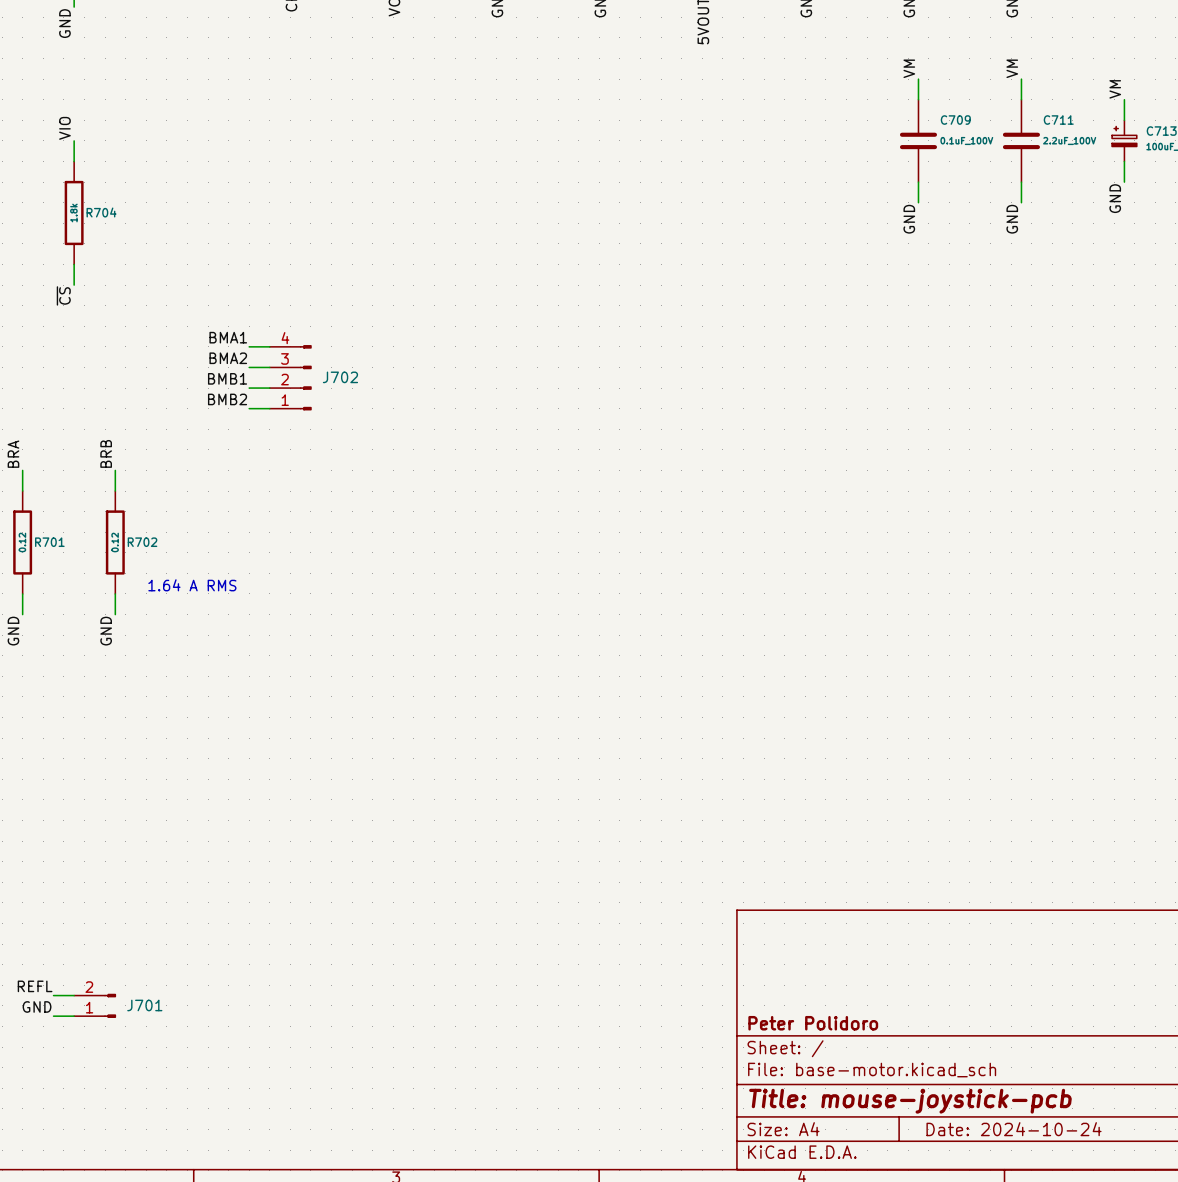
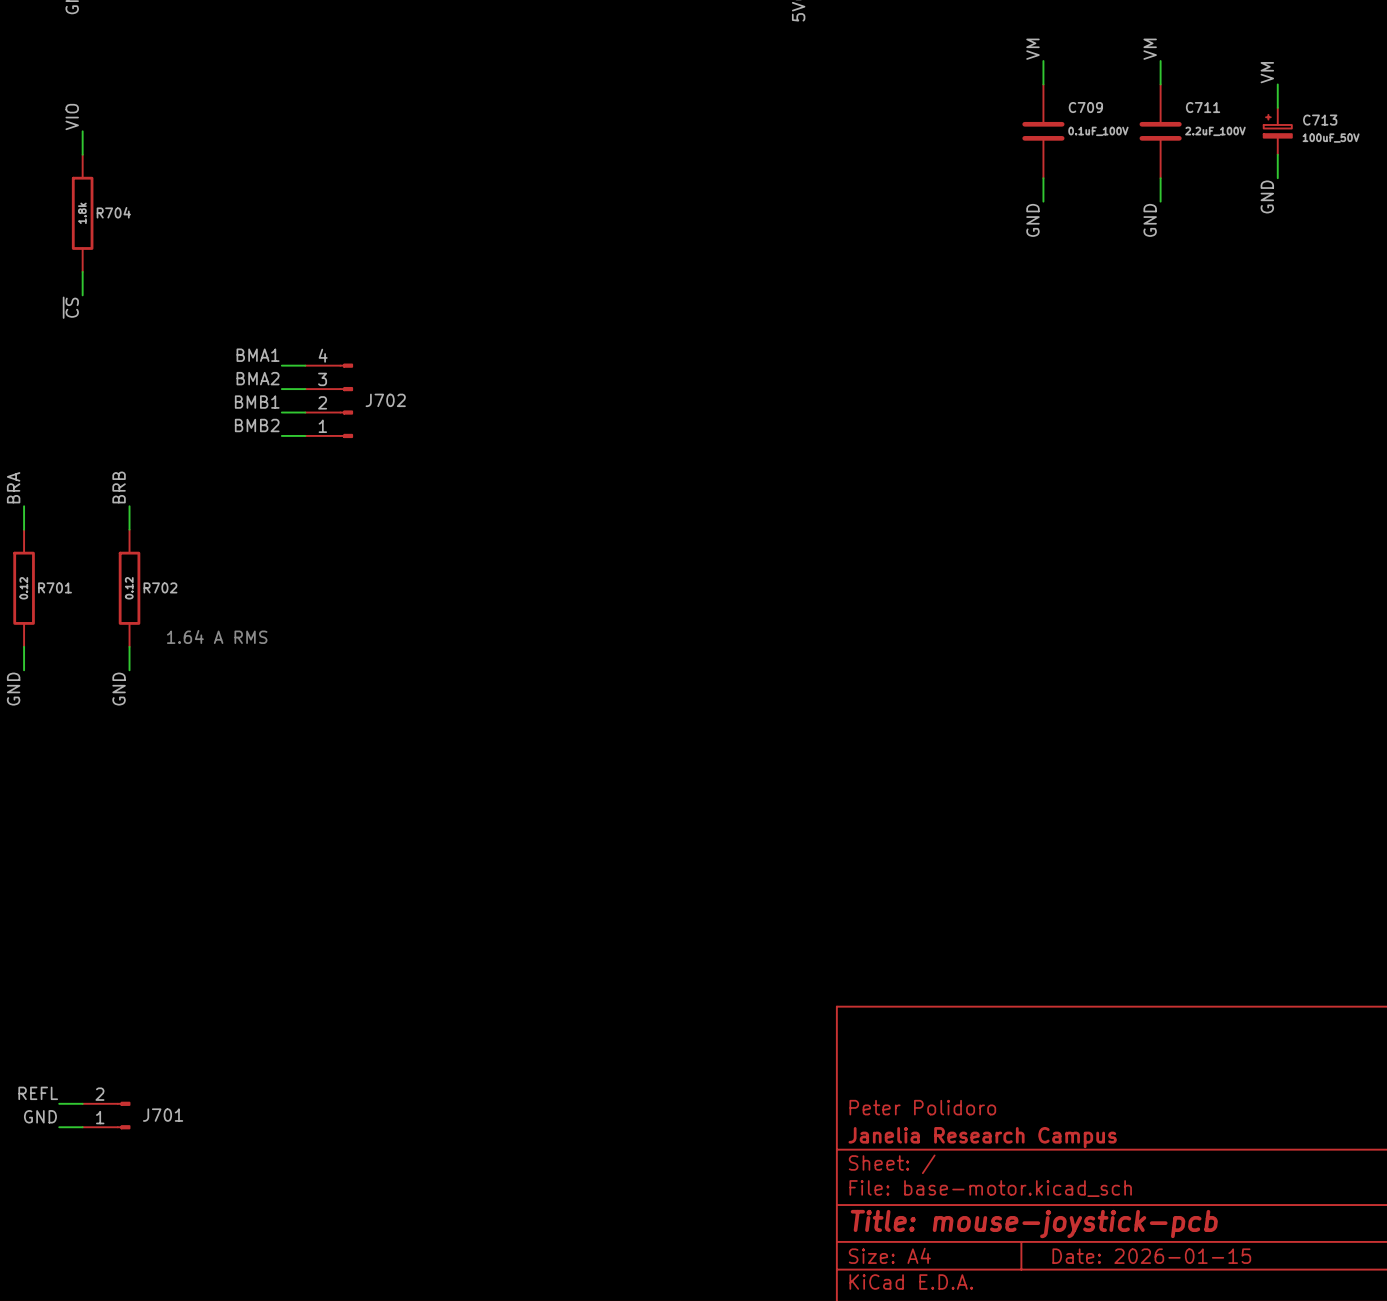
title block: none -> Peter Polidoro (922, 1107)
title block: Peter Polidoro (813, 1023) -> Janelia Research Campus (982, 1137)
title block: Date: 2024-10-24 (1014, 1129) -> Date: 2026-01-15 (1151, 1256)

